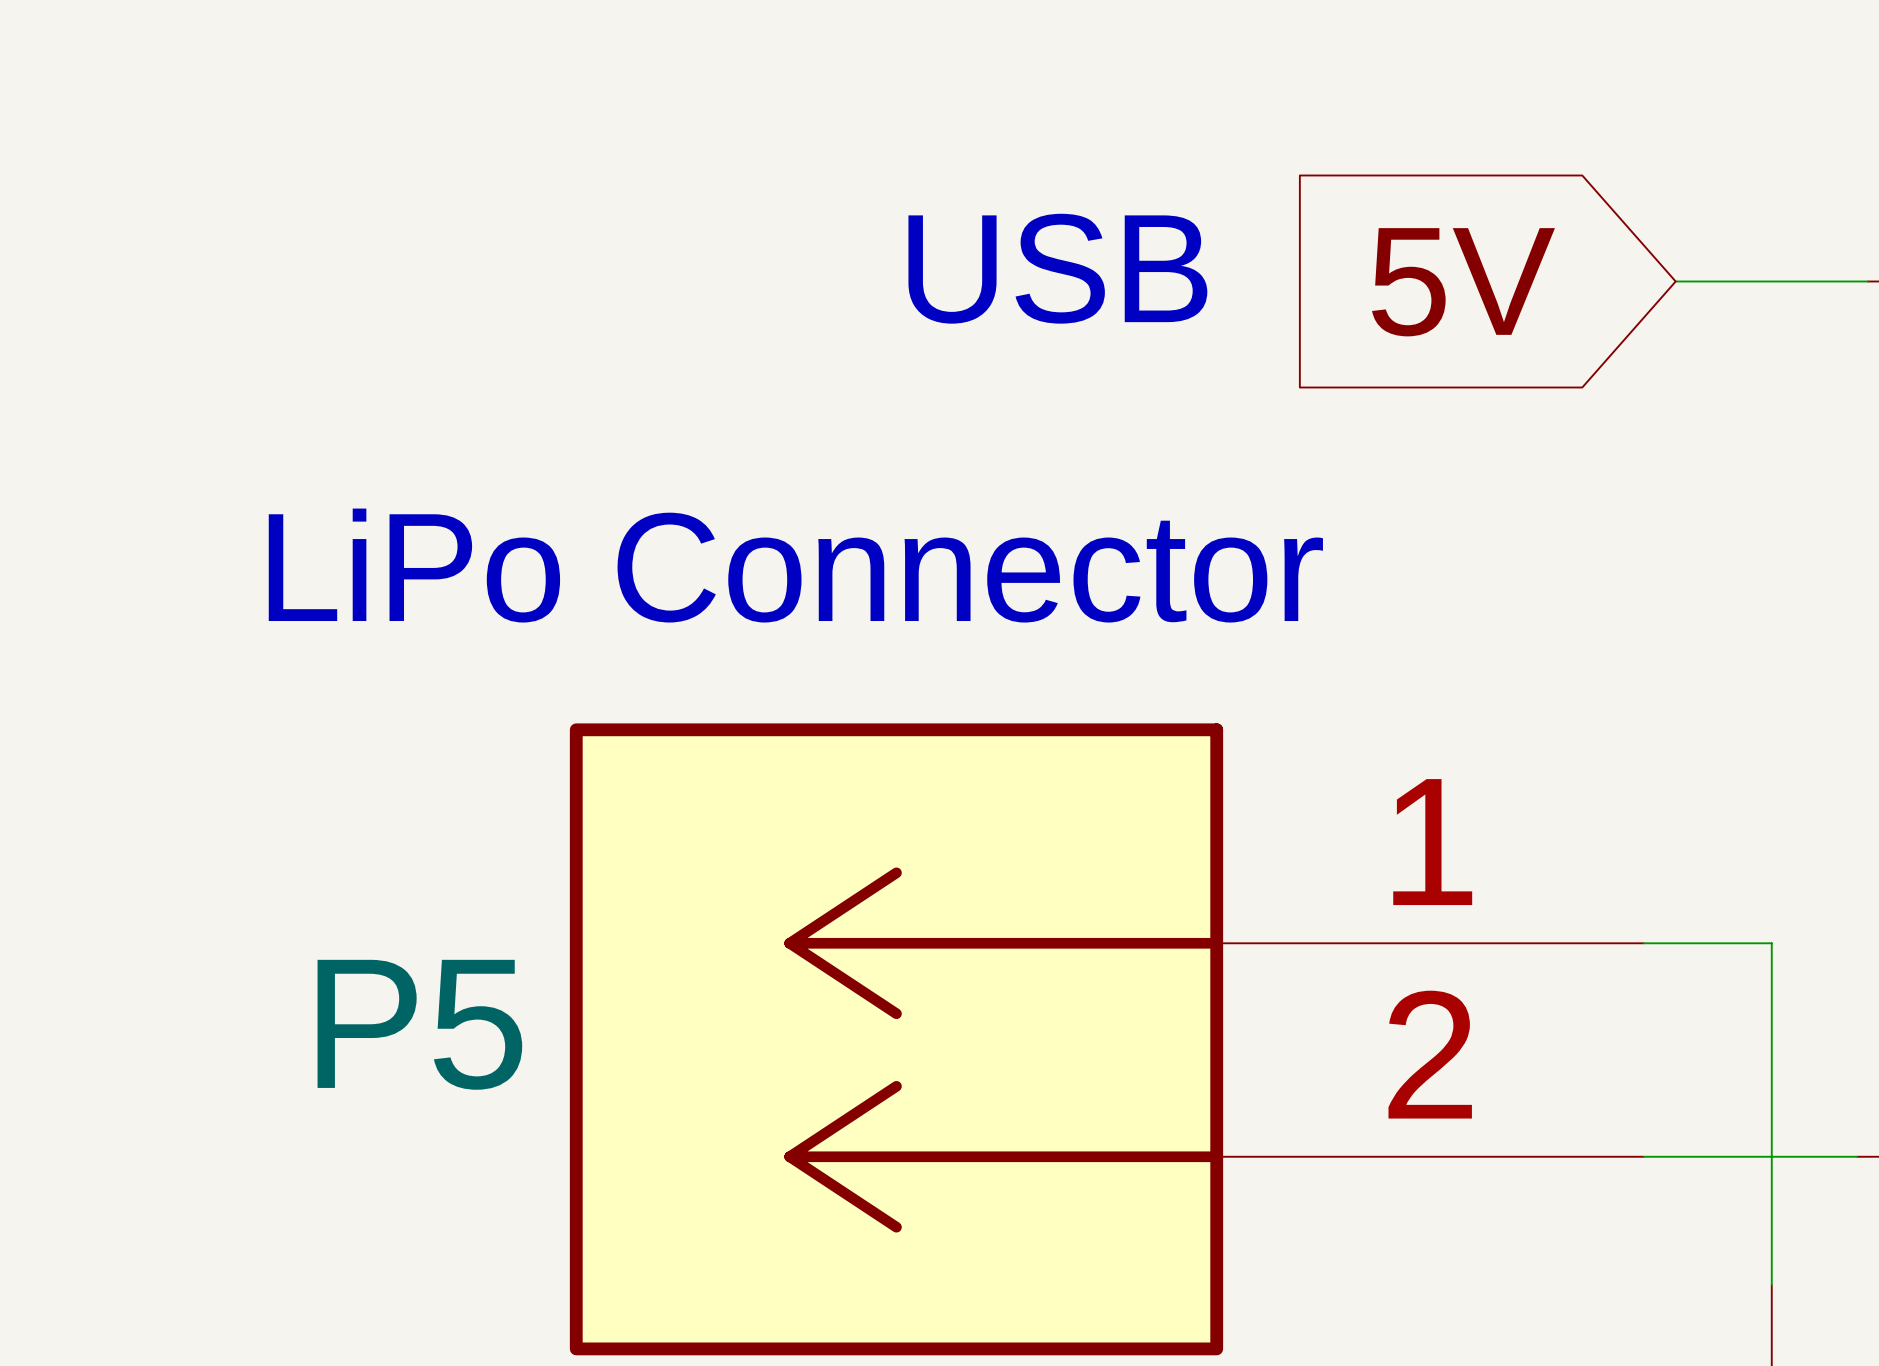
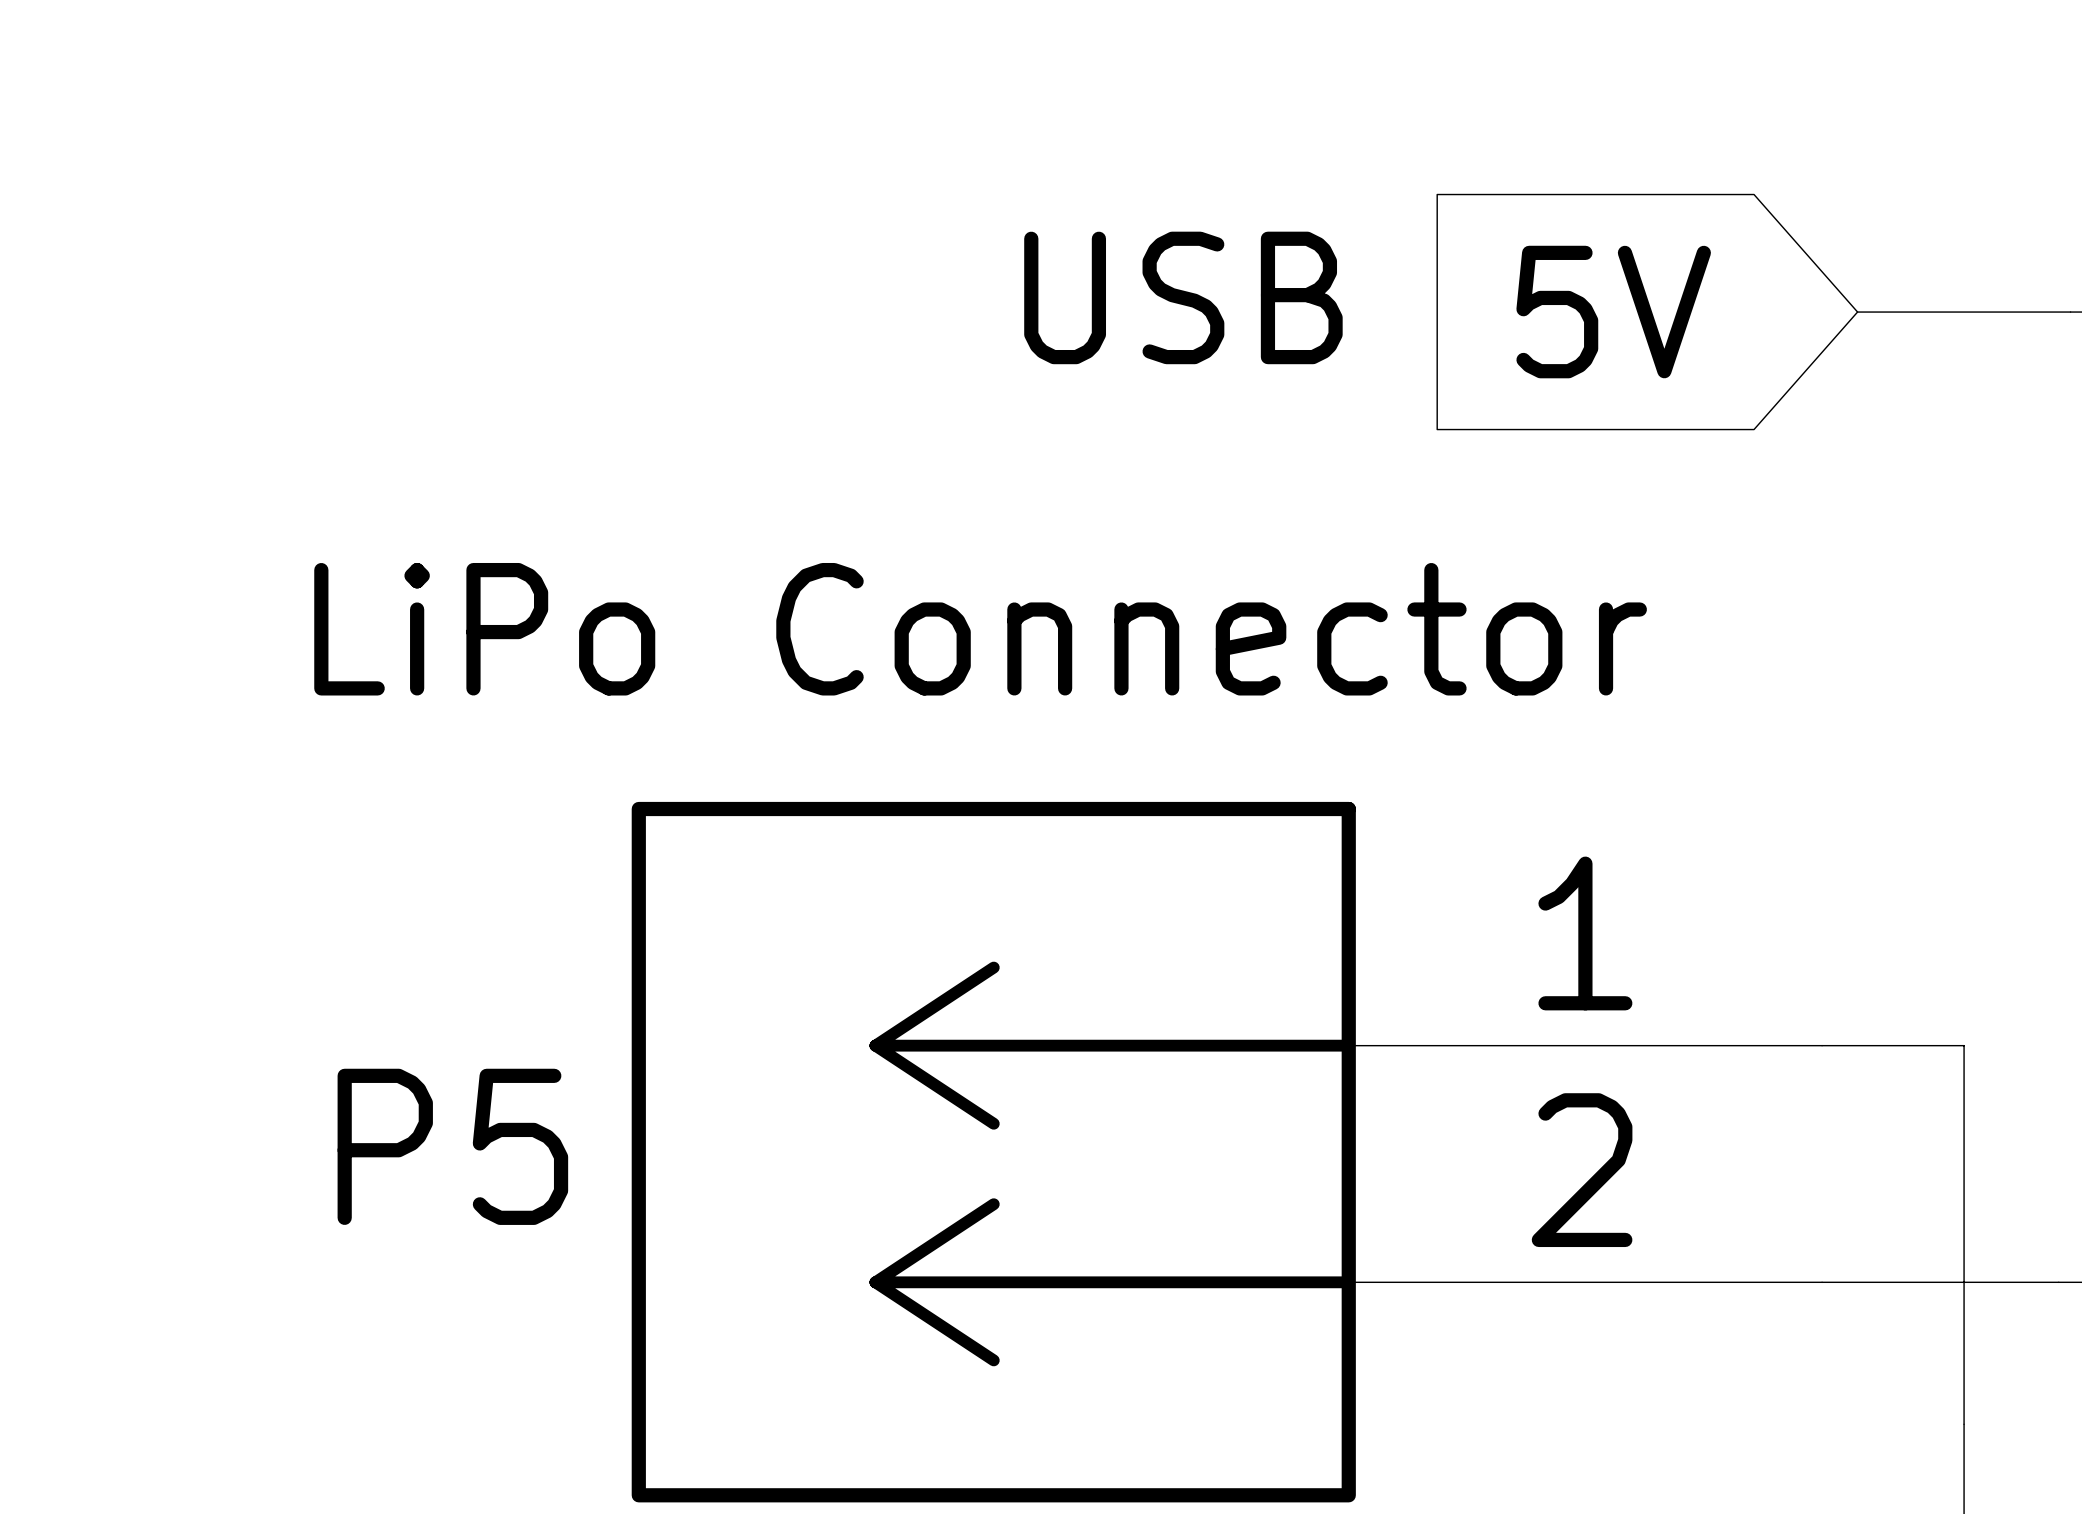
P5 name position: P5 (419, 1024) -> P5 (452, 1146)

